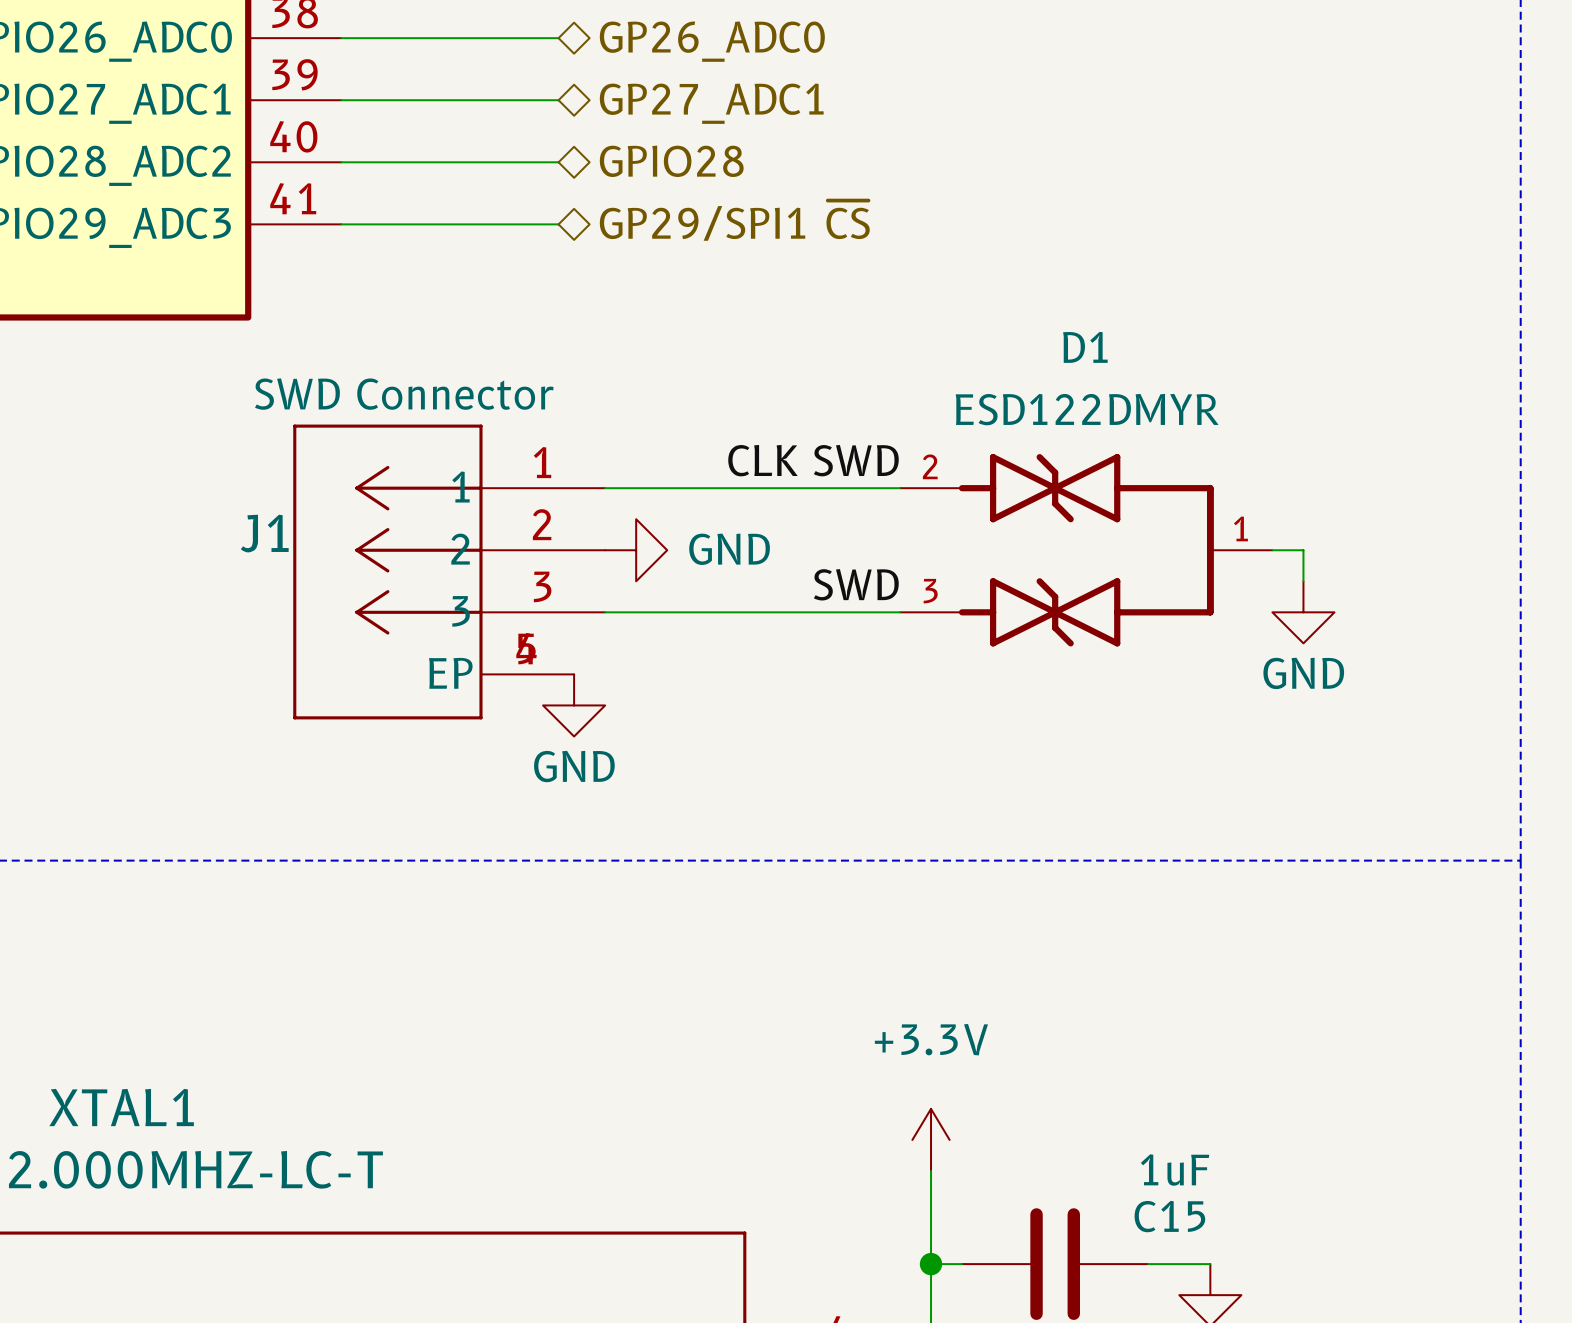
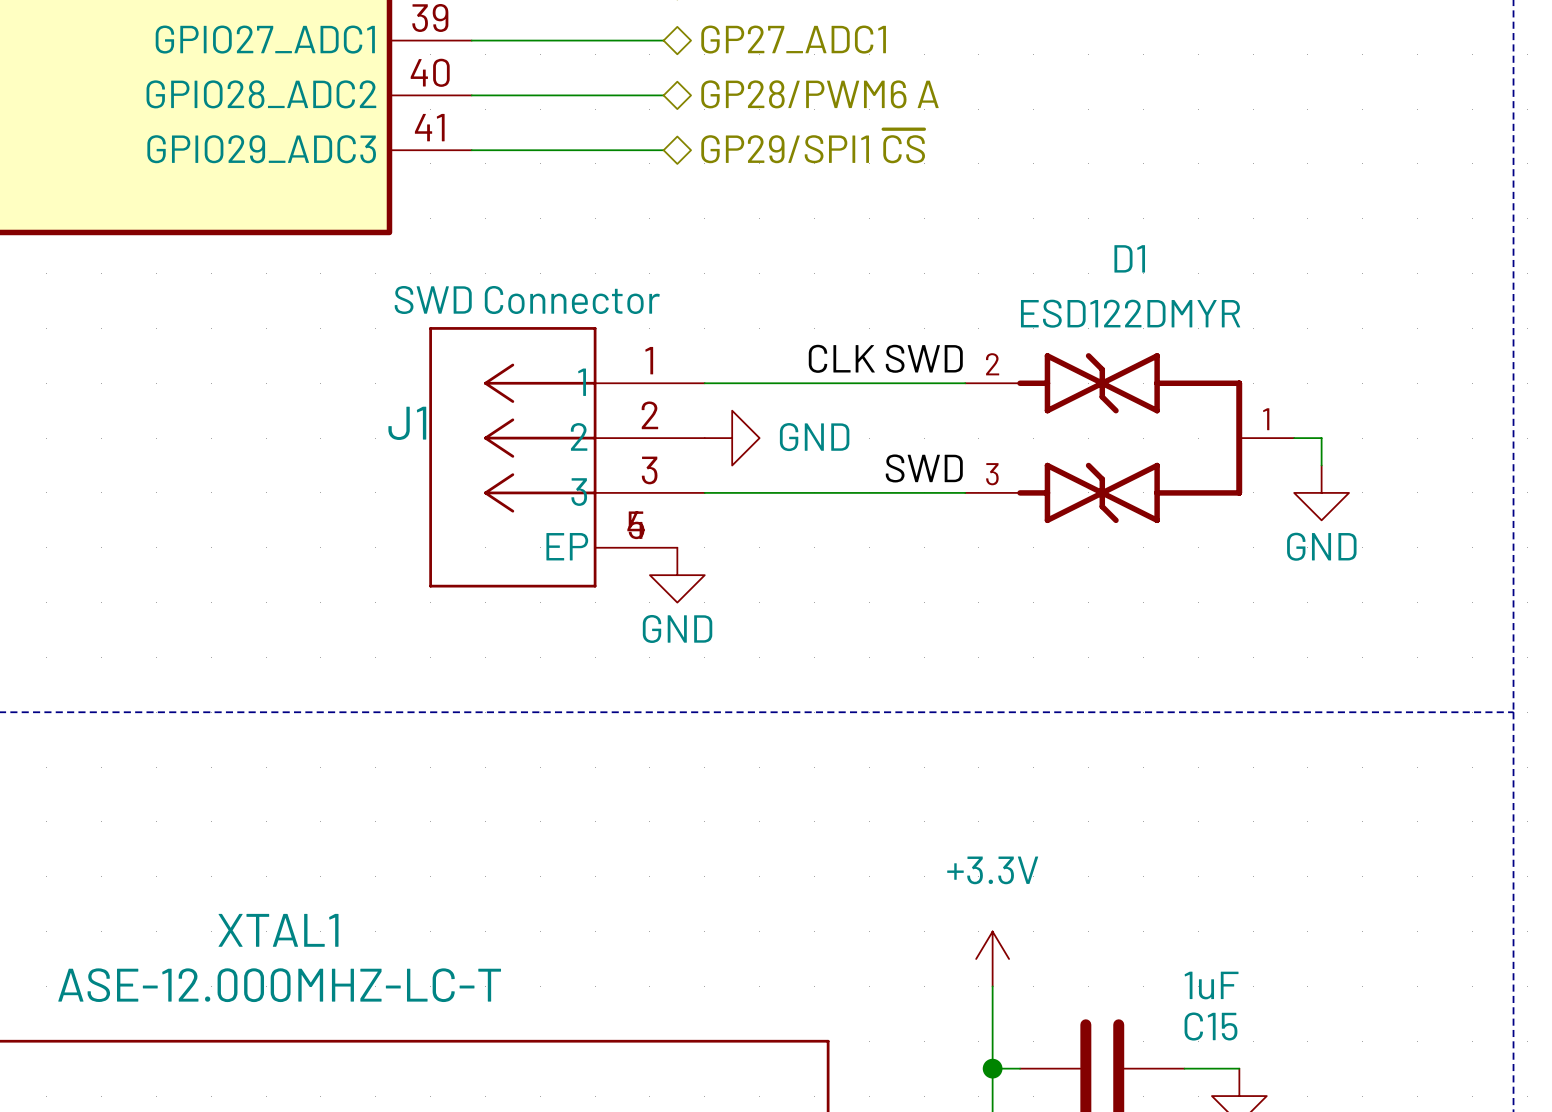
hierarchical label: GPIO28 (671, 161) -> GP28/PWM6 A (819, 94)

